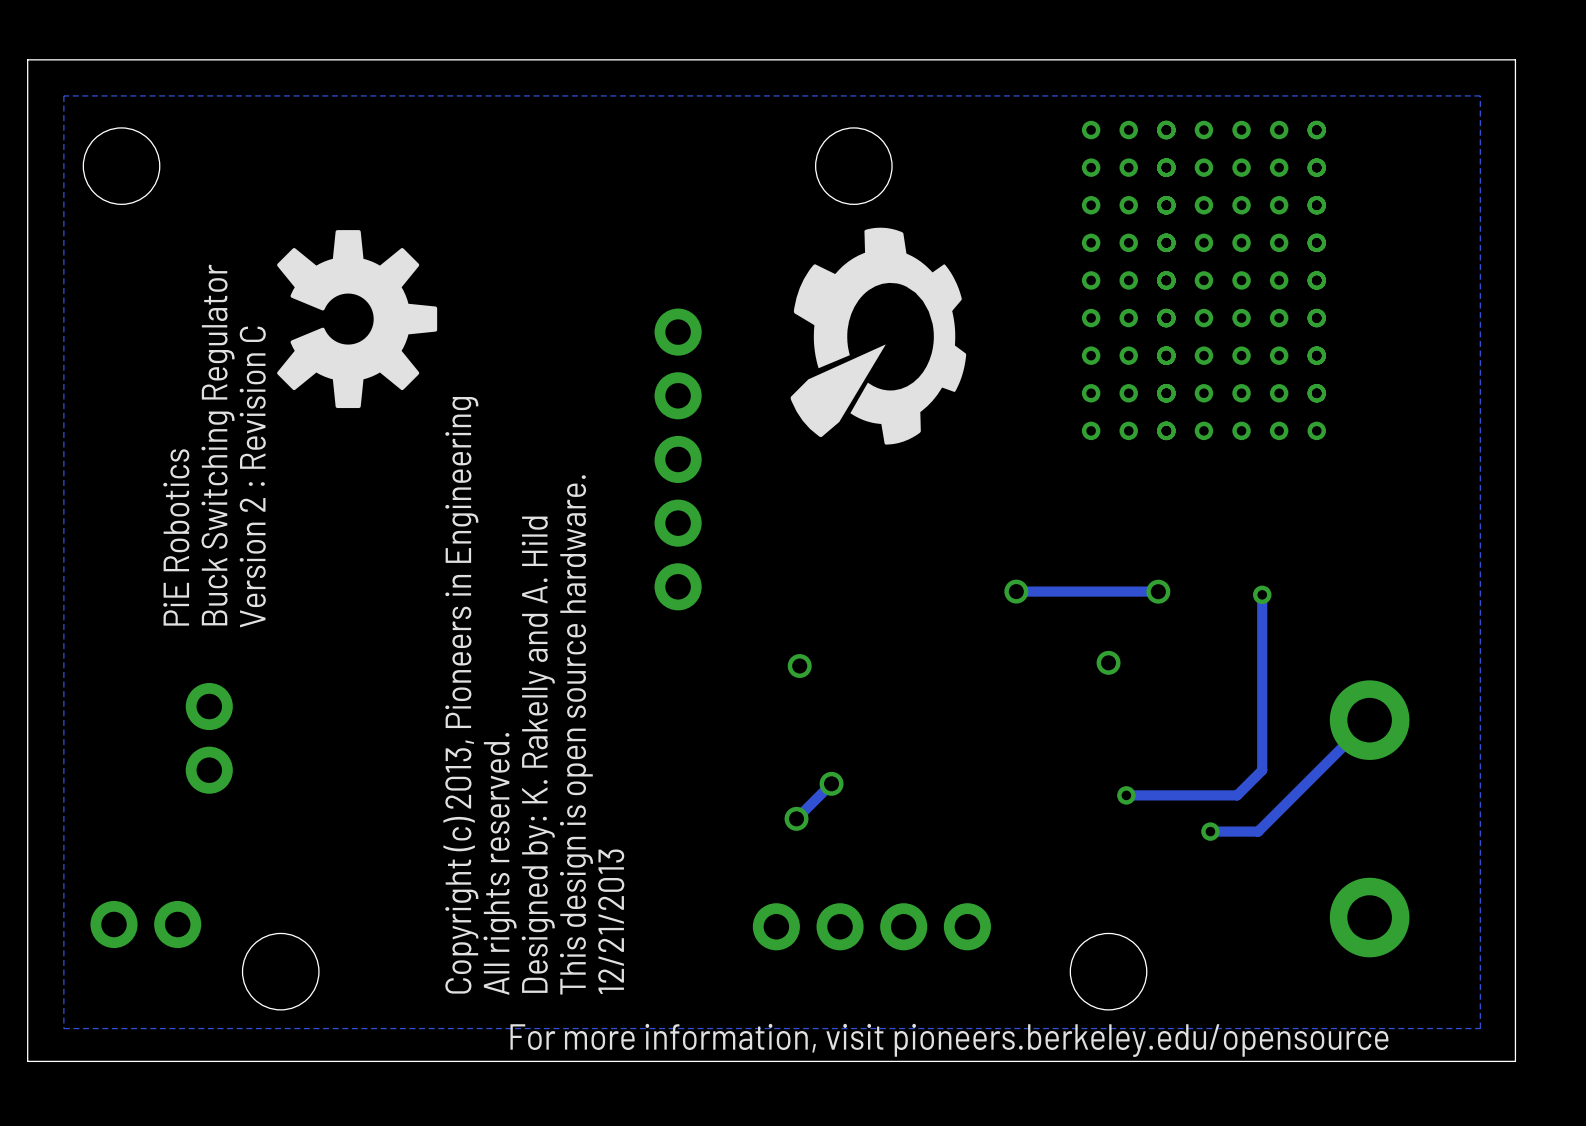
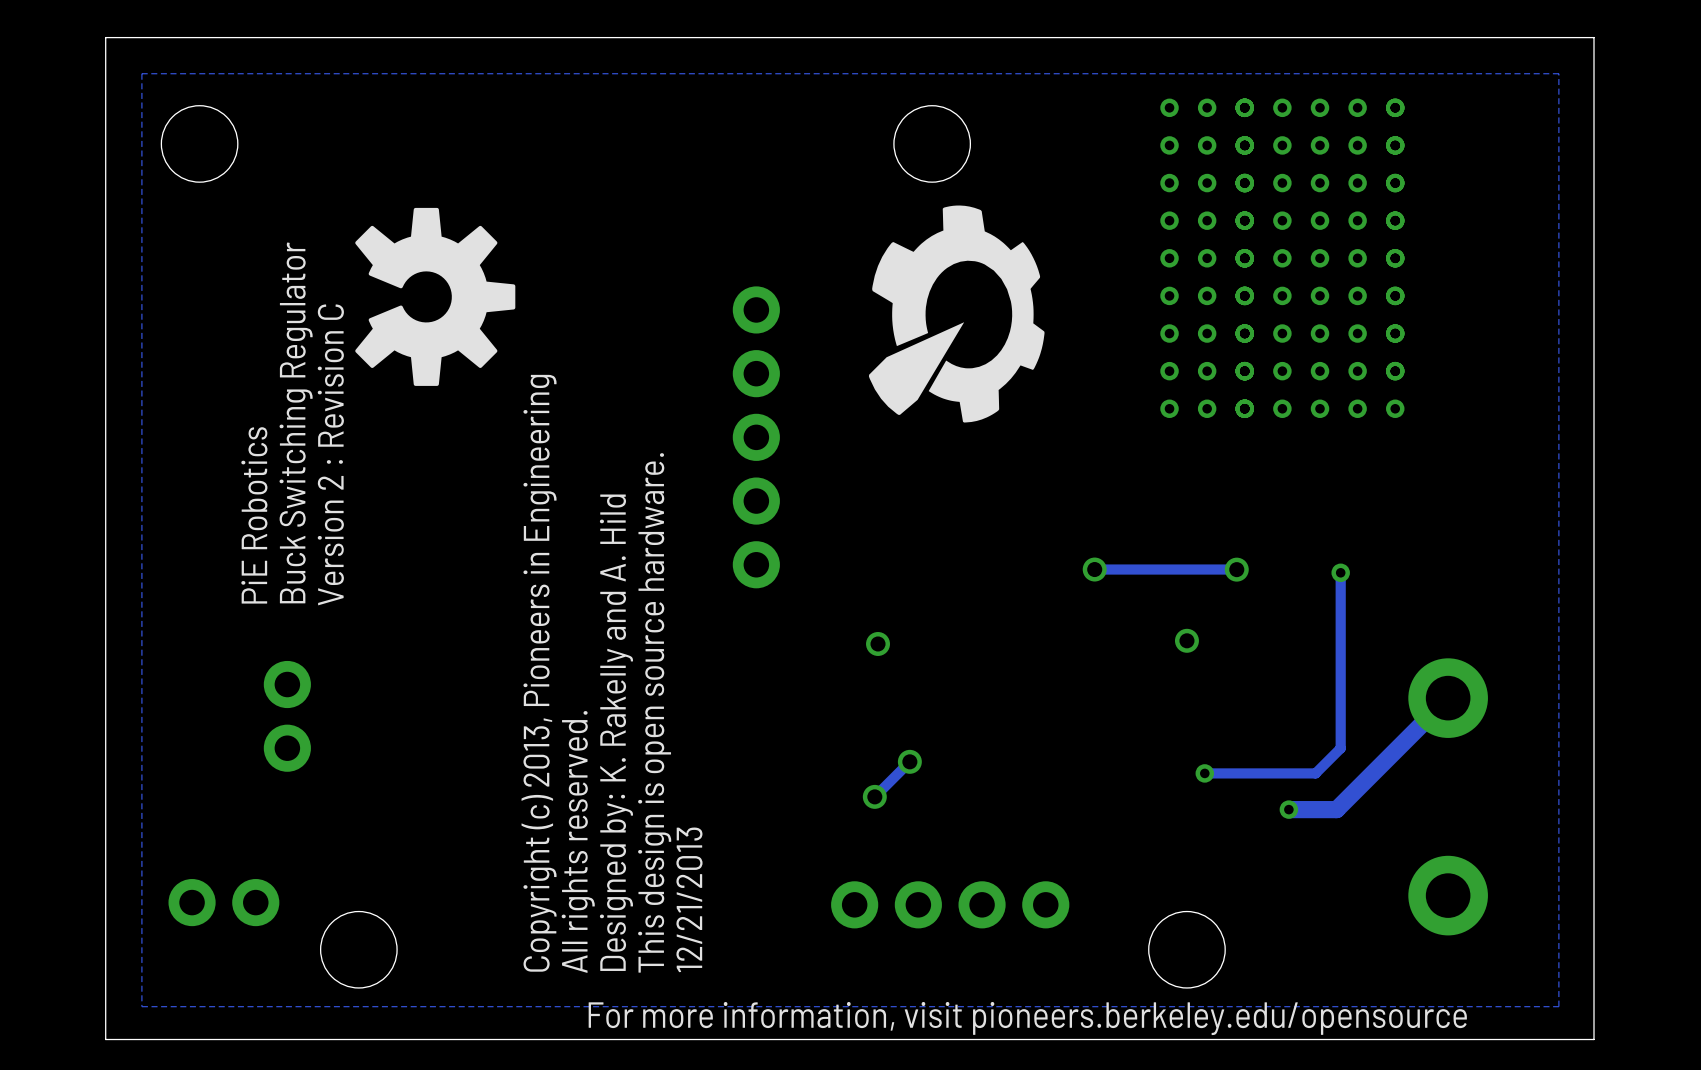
track width: thin (1369, 720) (1258, 831) (1210, 831) -> thick (1448, 698) (1336, 809) (1288, 809)

